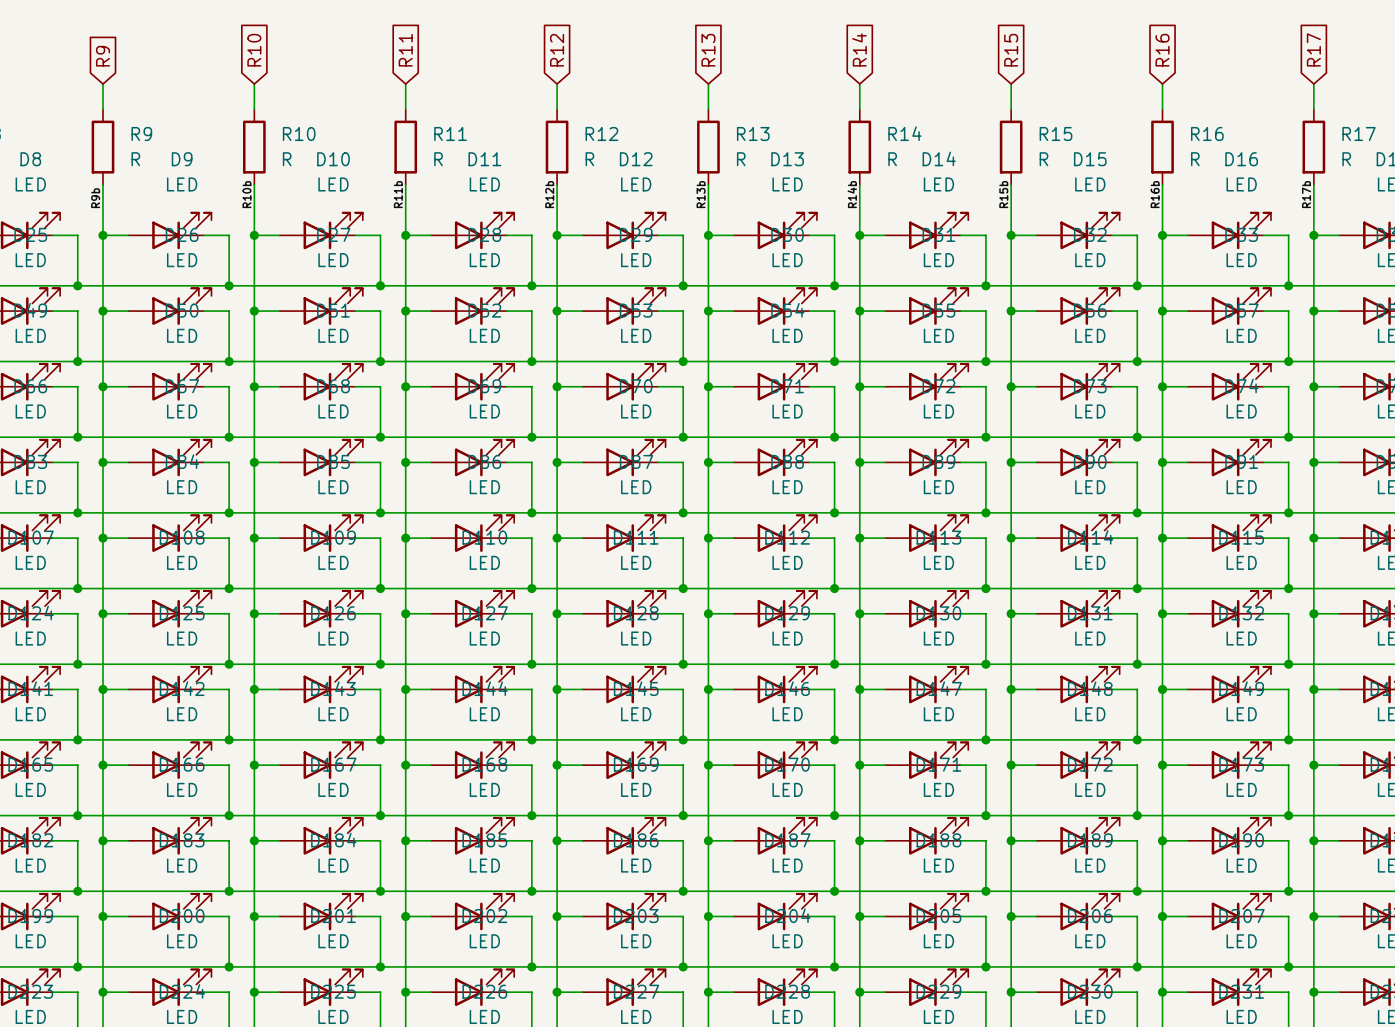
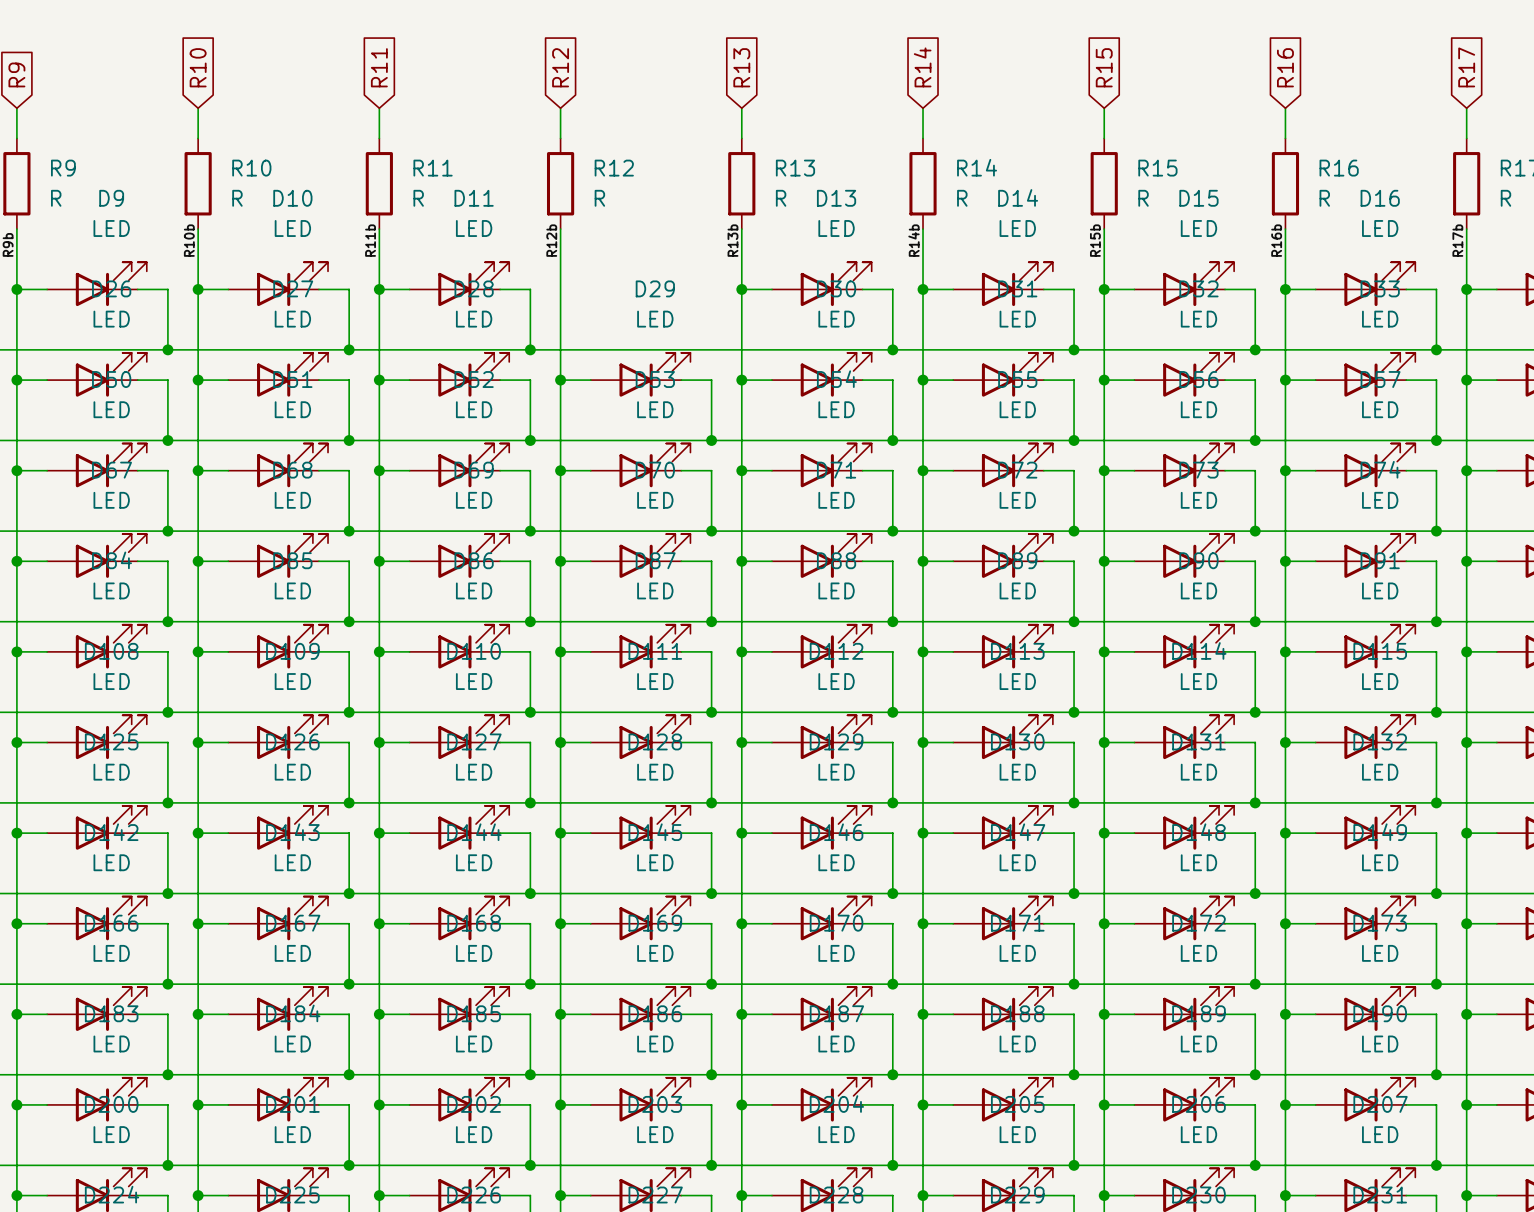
D12: LED (623, 230) -> none
wire: (557, 235) (582, 235) -> none
junction: (557, 235) -> none
wire: (657, 235) (683, 235) (683, 285) -> none
junction: (683, 285) -> none

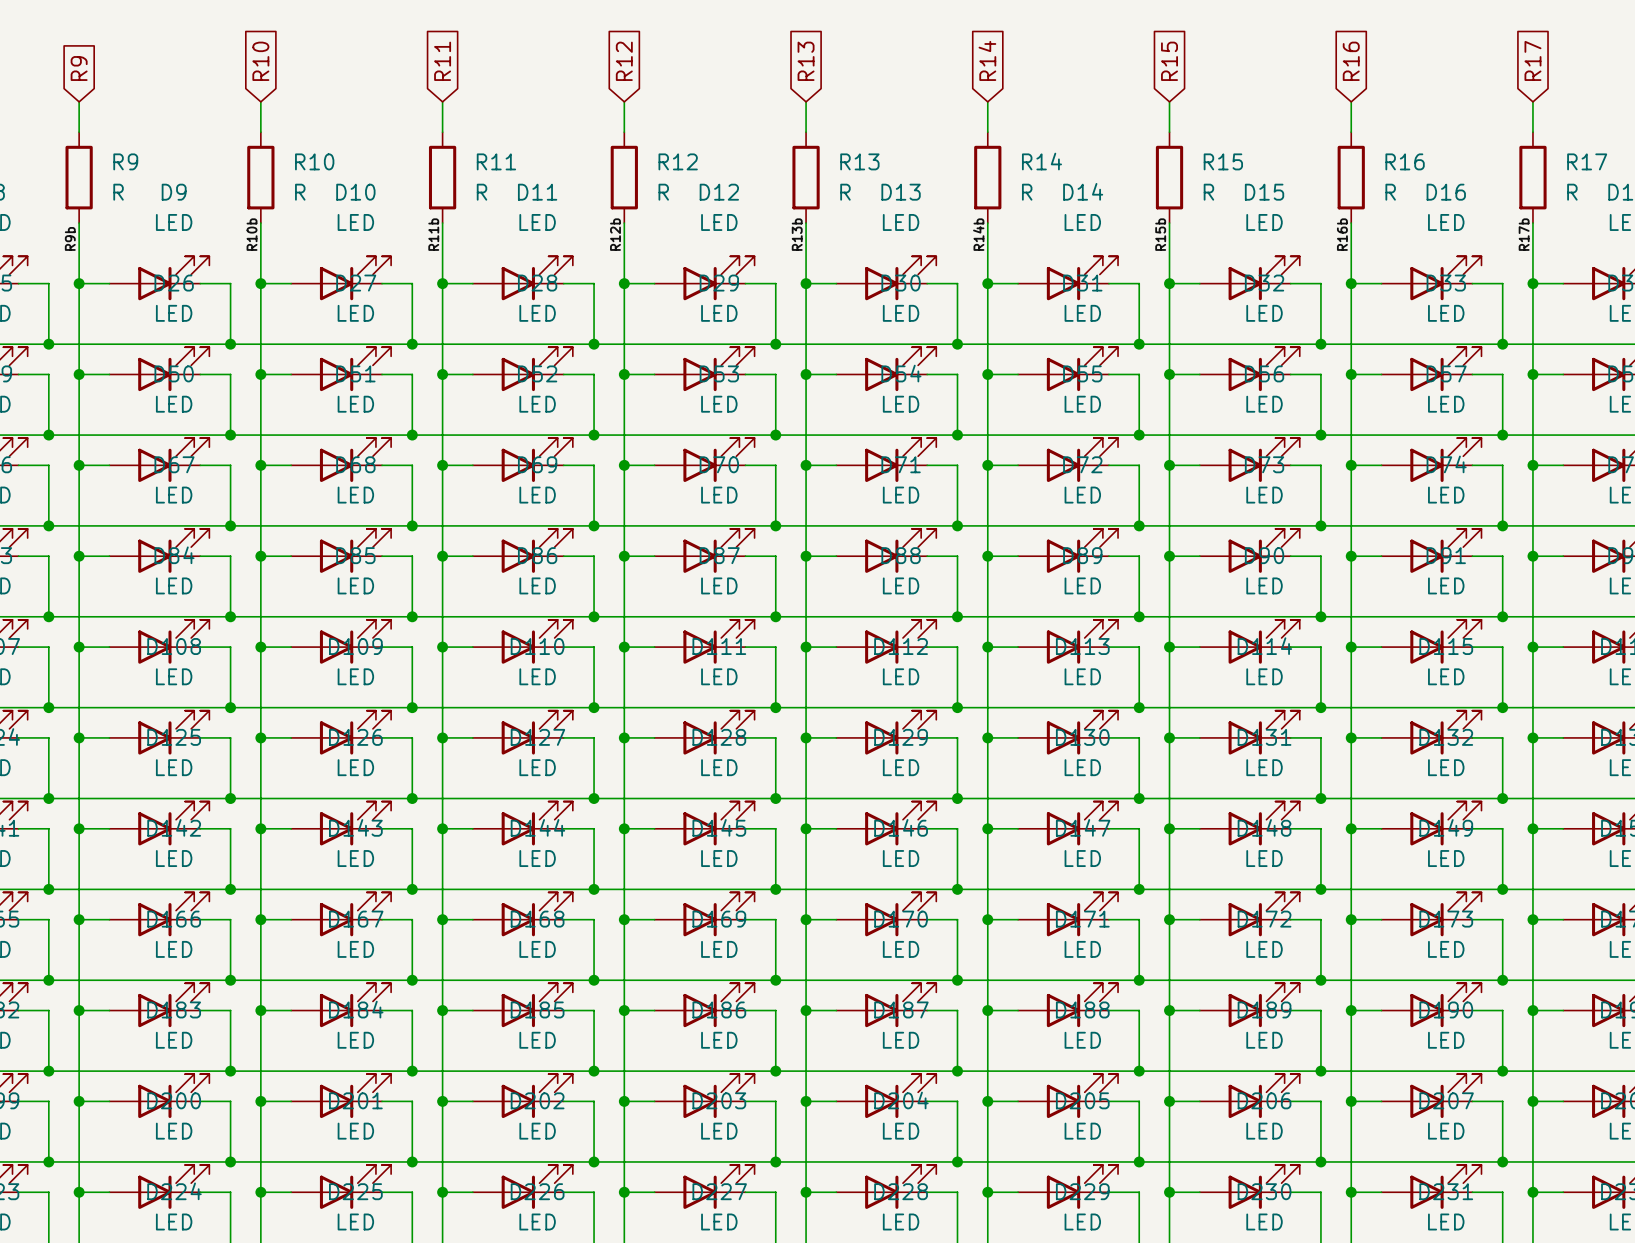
D12: none -> LED (704, 278)
wire: none -> (624, 283) (654, 283)
junction: none -> (624, 283)
wire: none -> (745, 283) (775, 283) (775, 344)
junction: none -> (775, 344)

